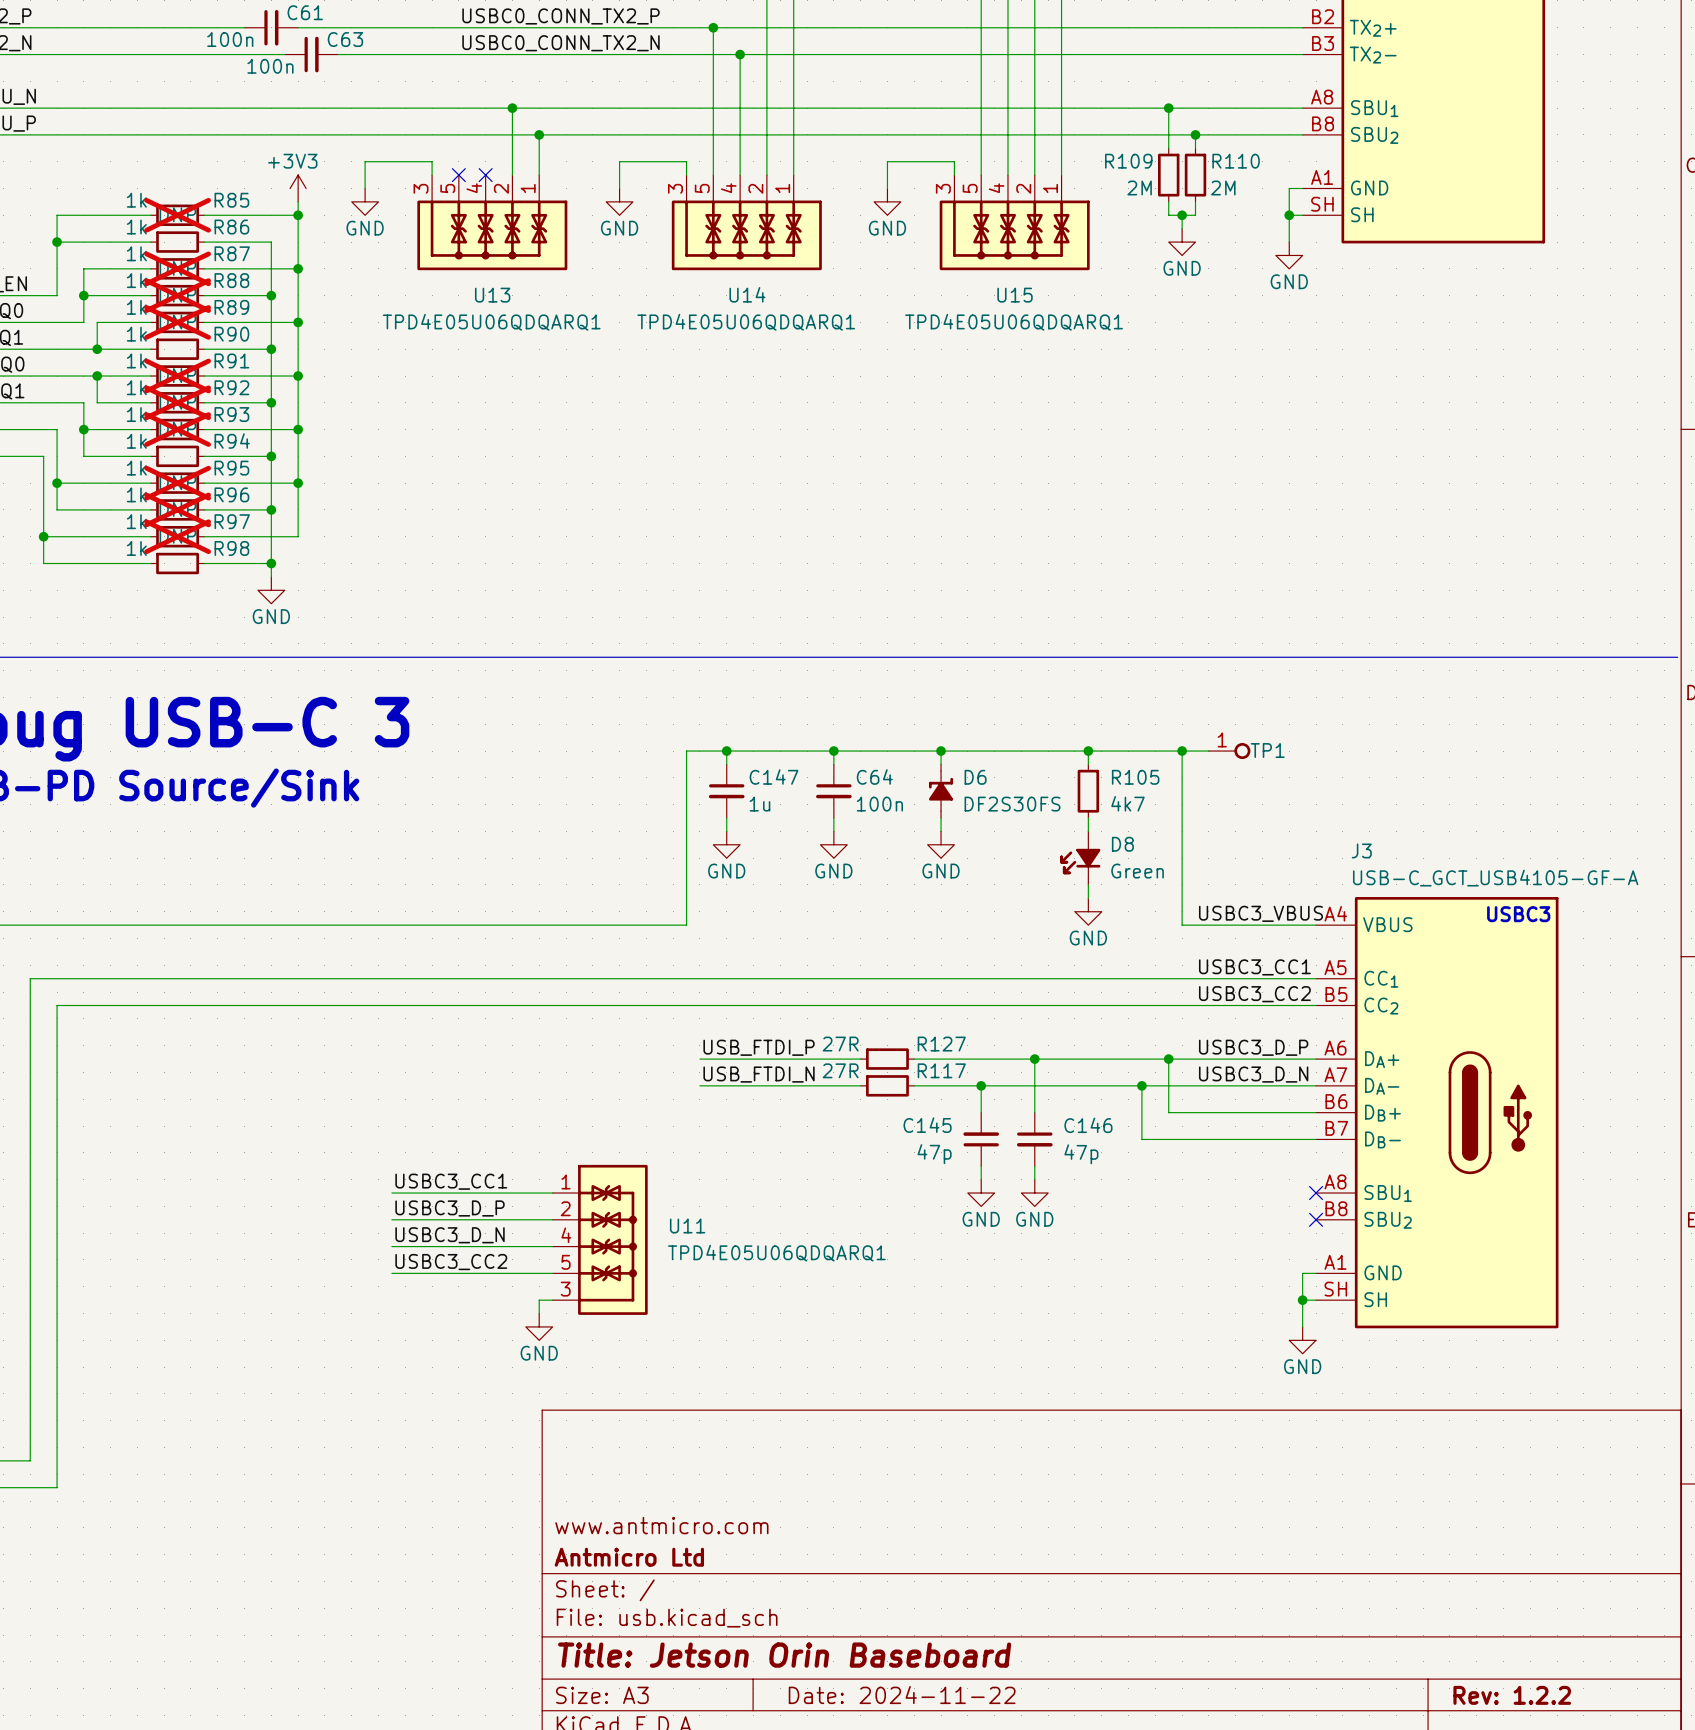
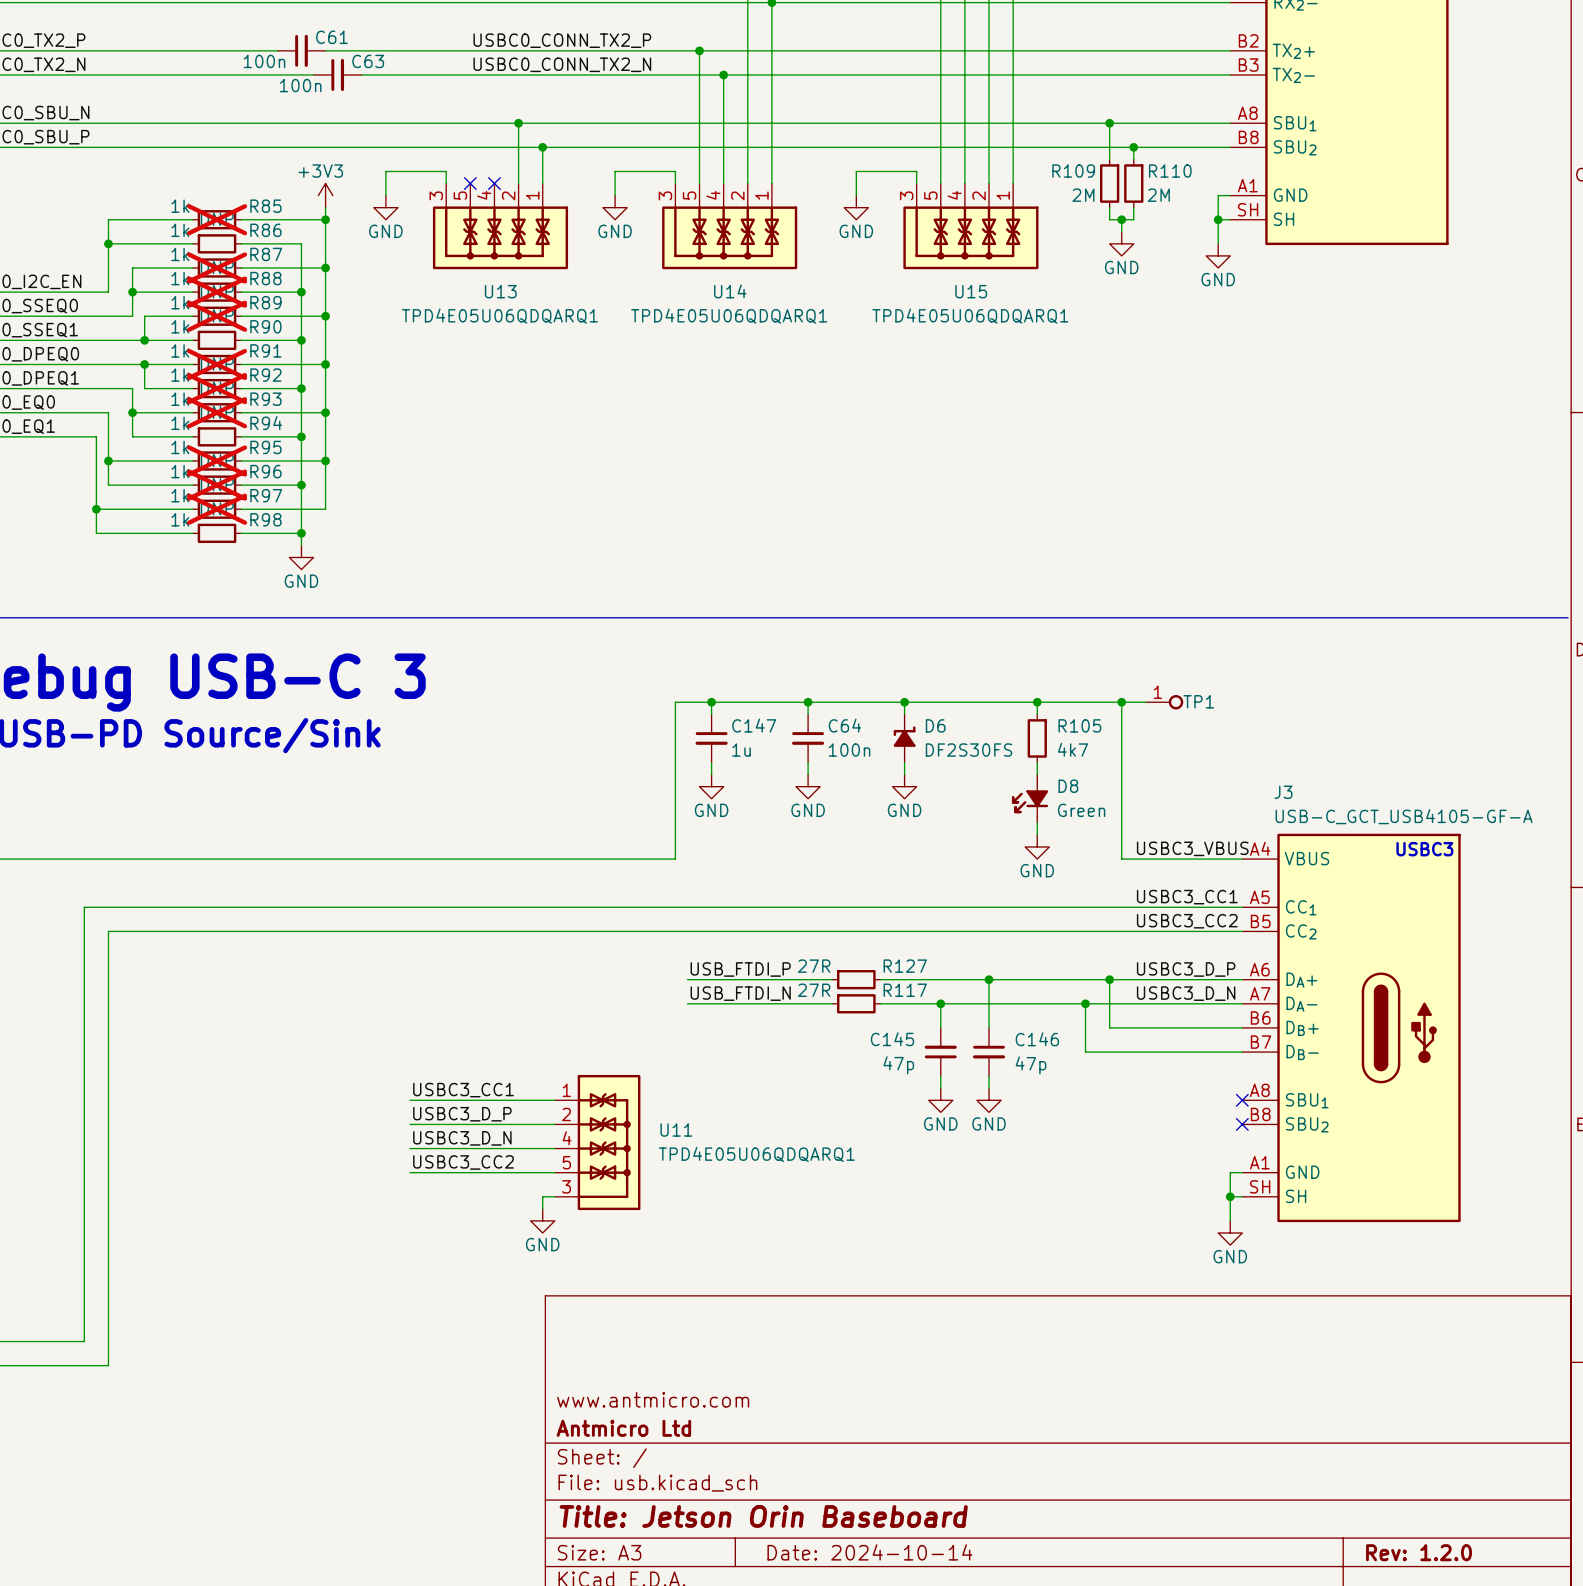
title block: Date: 2024-11-22 (902, 1694) -> Date: 2024-10-14 (869, 1552)
title block: Rev: 1.2.2 (1512, 1695) -> Rev: 1.2.0 (1419, 1552)

